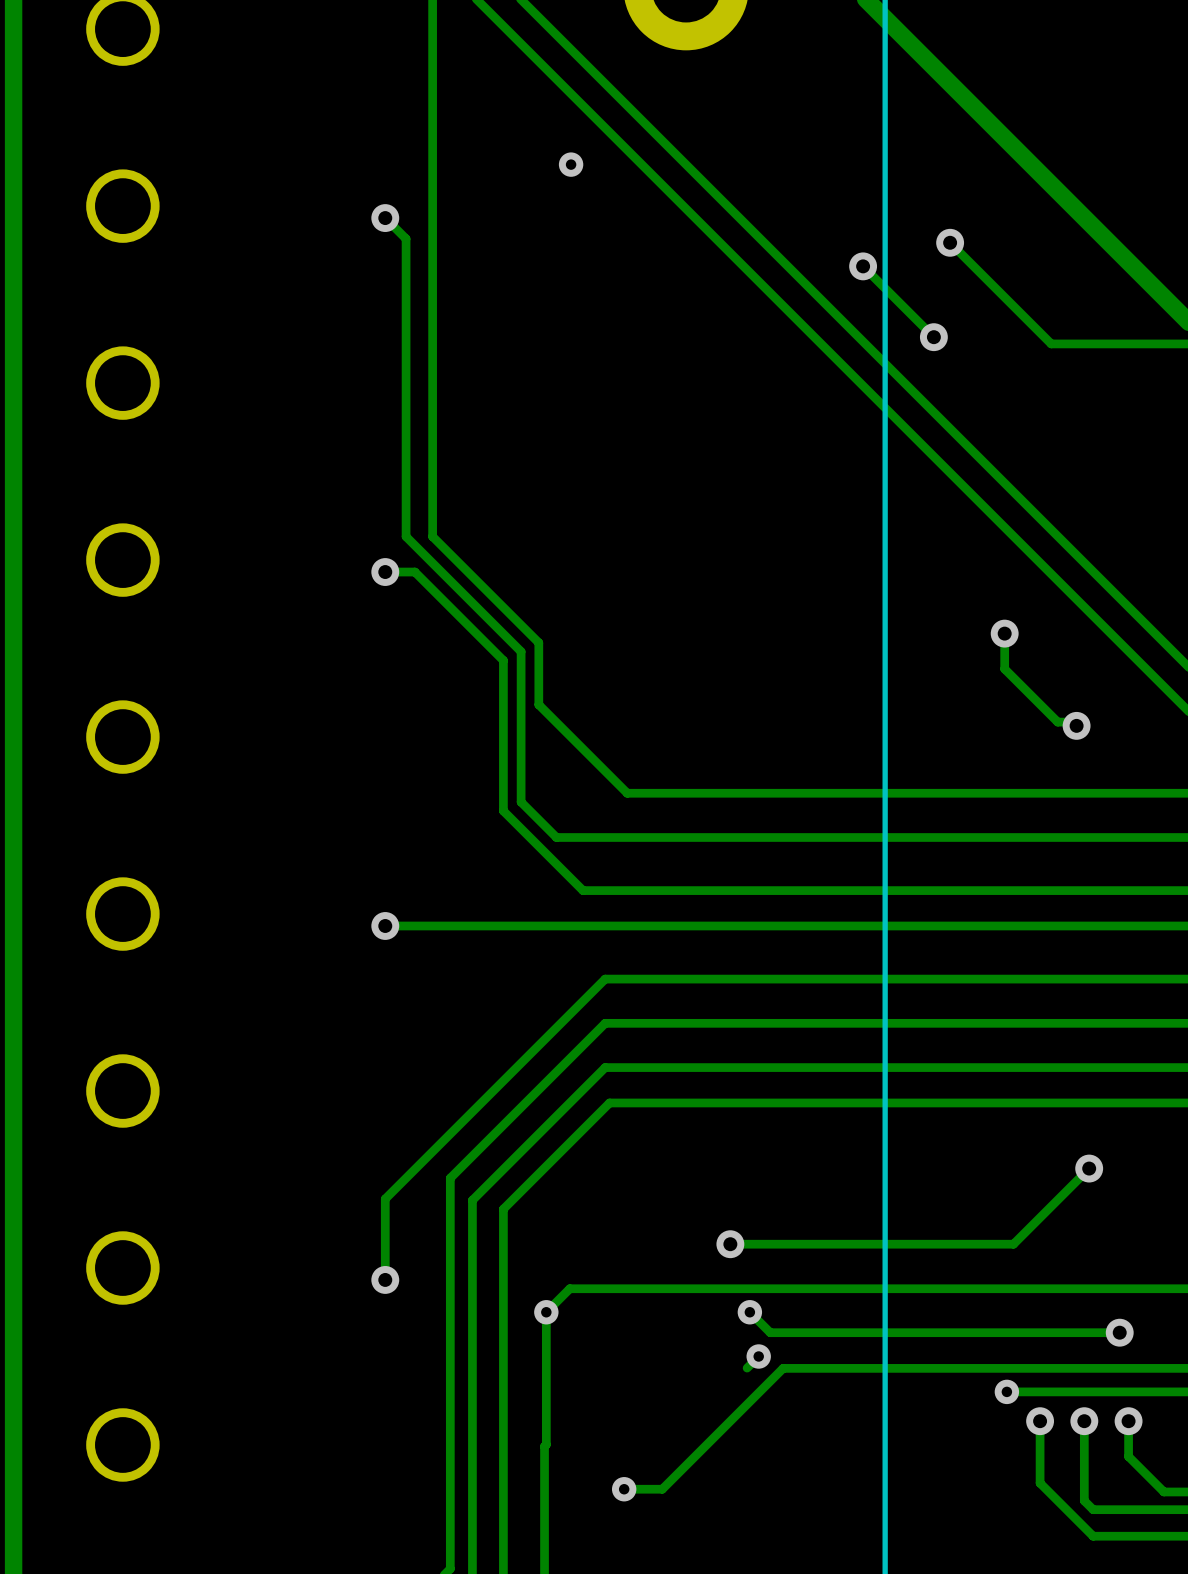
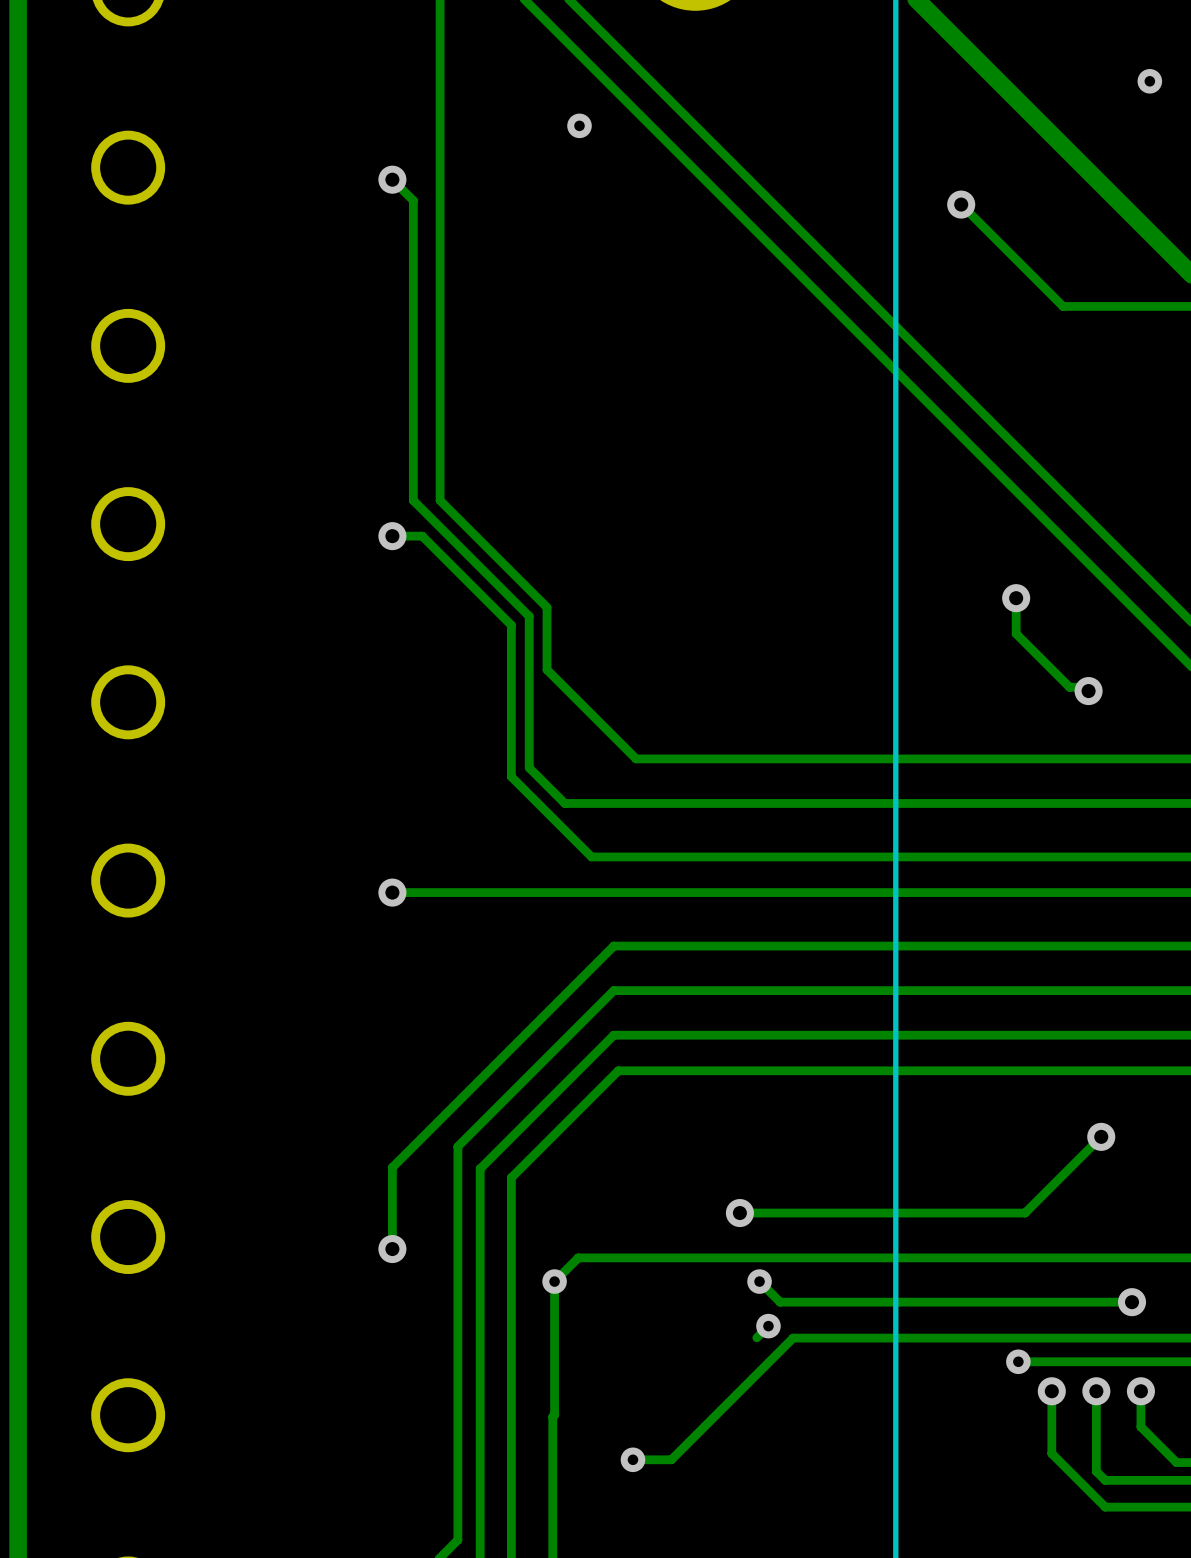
via: none -> (1149, 81)
track: (863, 266) (933, 337) -> none
via: (863, 266) -> none
via: (933, 337) -> none

